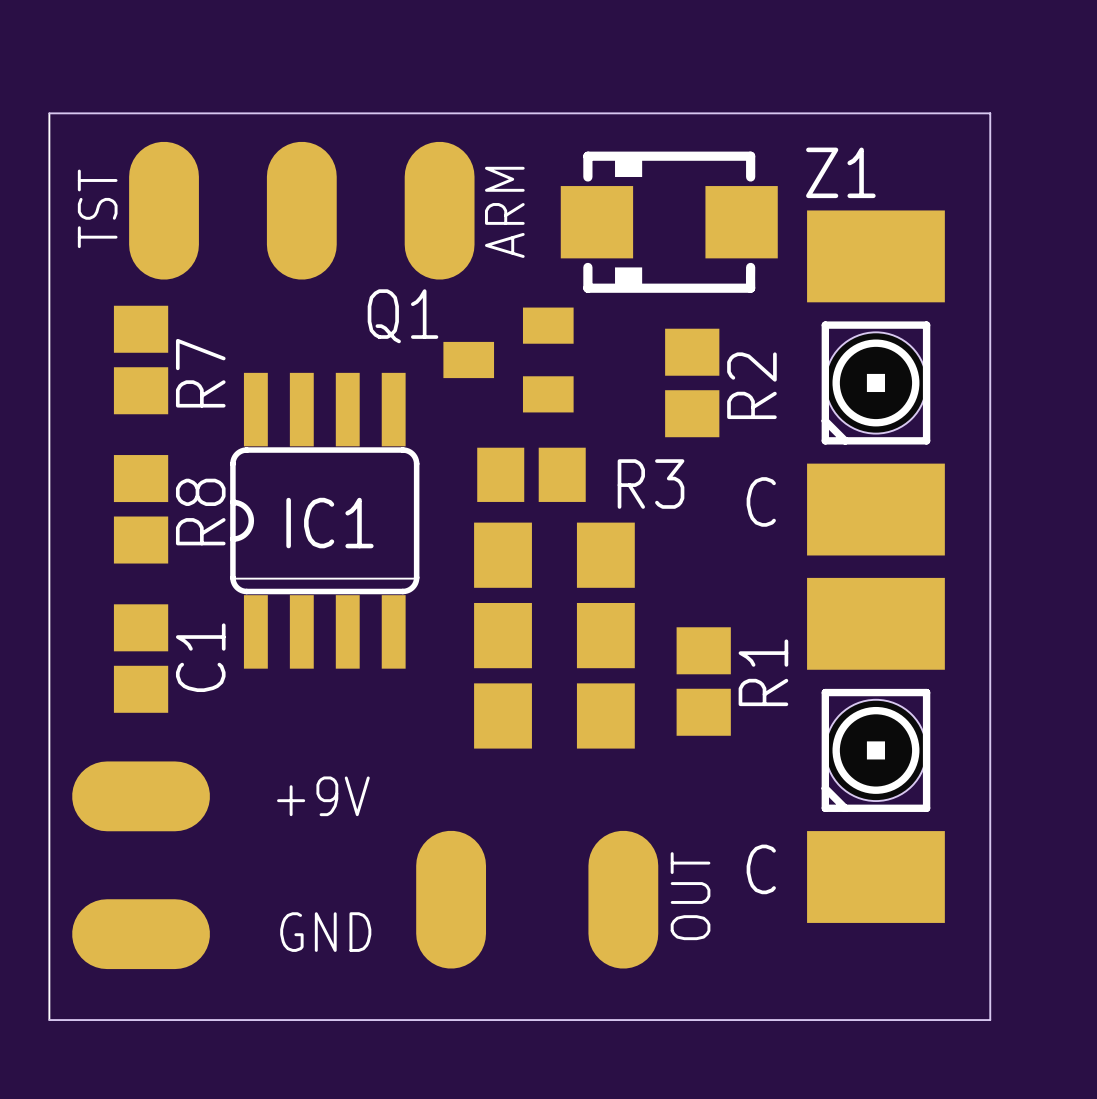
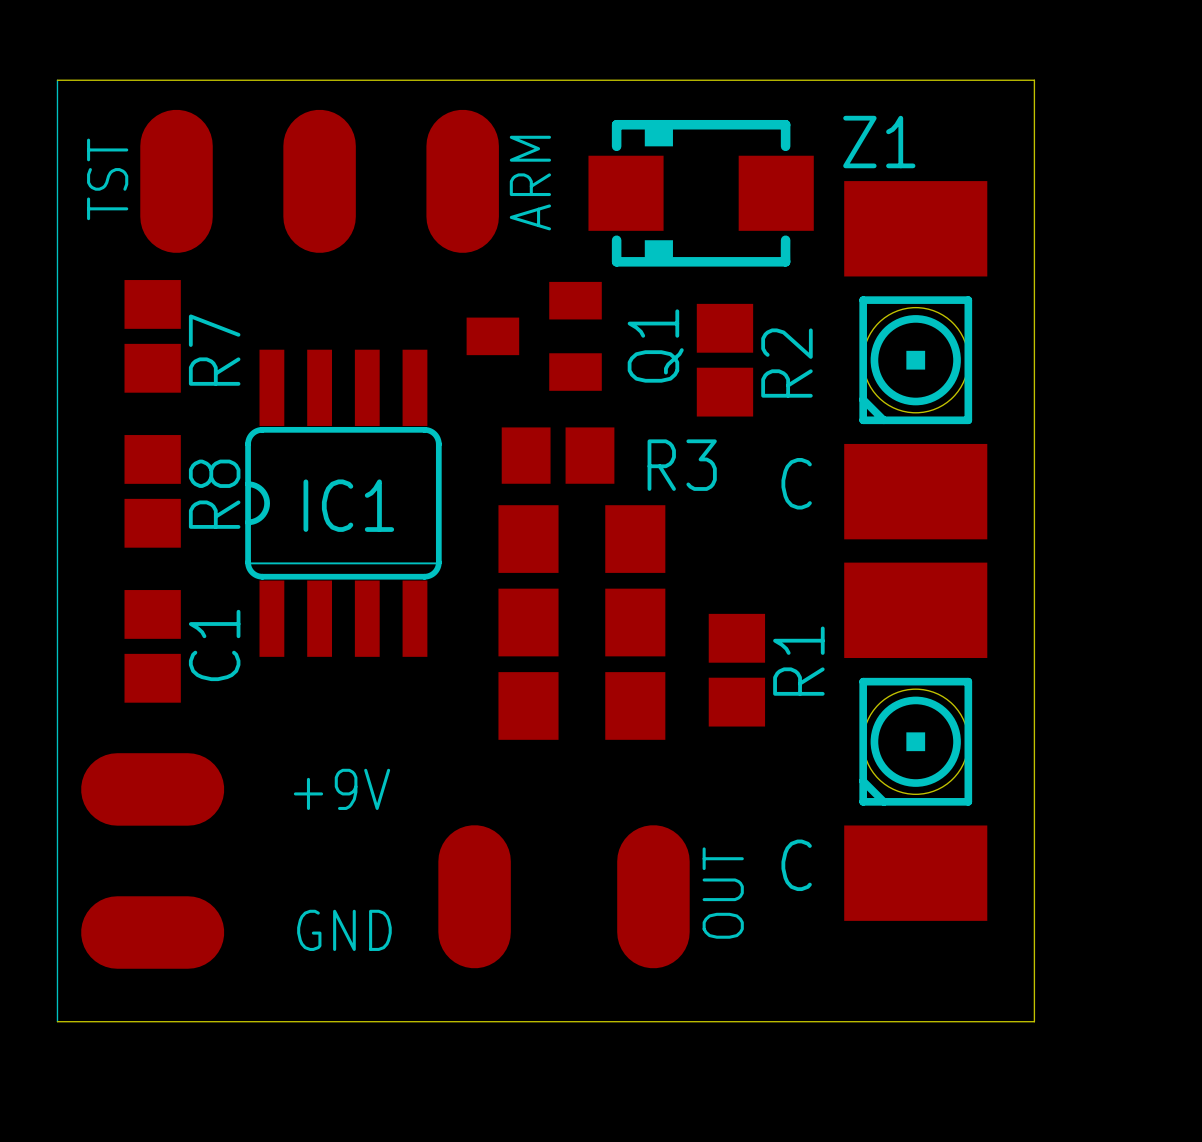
Q1 name rotation: 0° (402, 316) -> 90° counterclockwise (655, 346)
Q1 name position: Q1 (402, 316) -> Q1 (655, 346)

